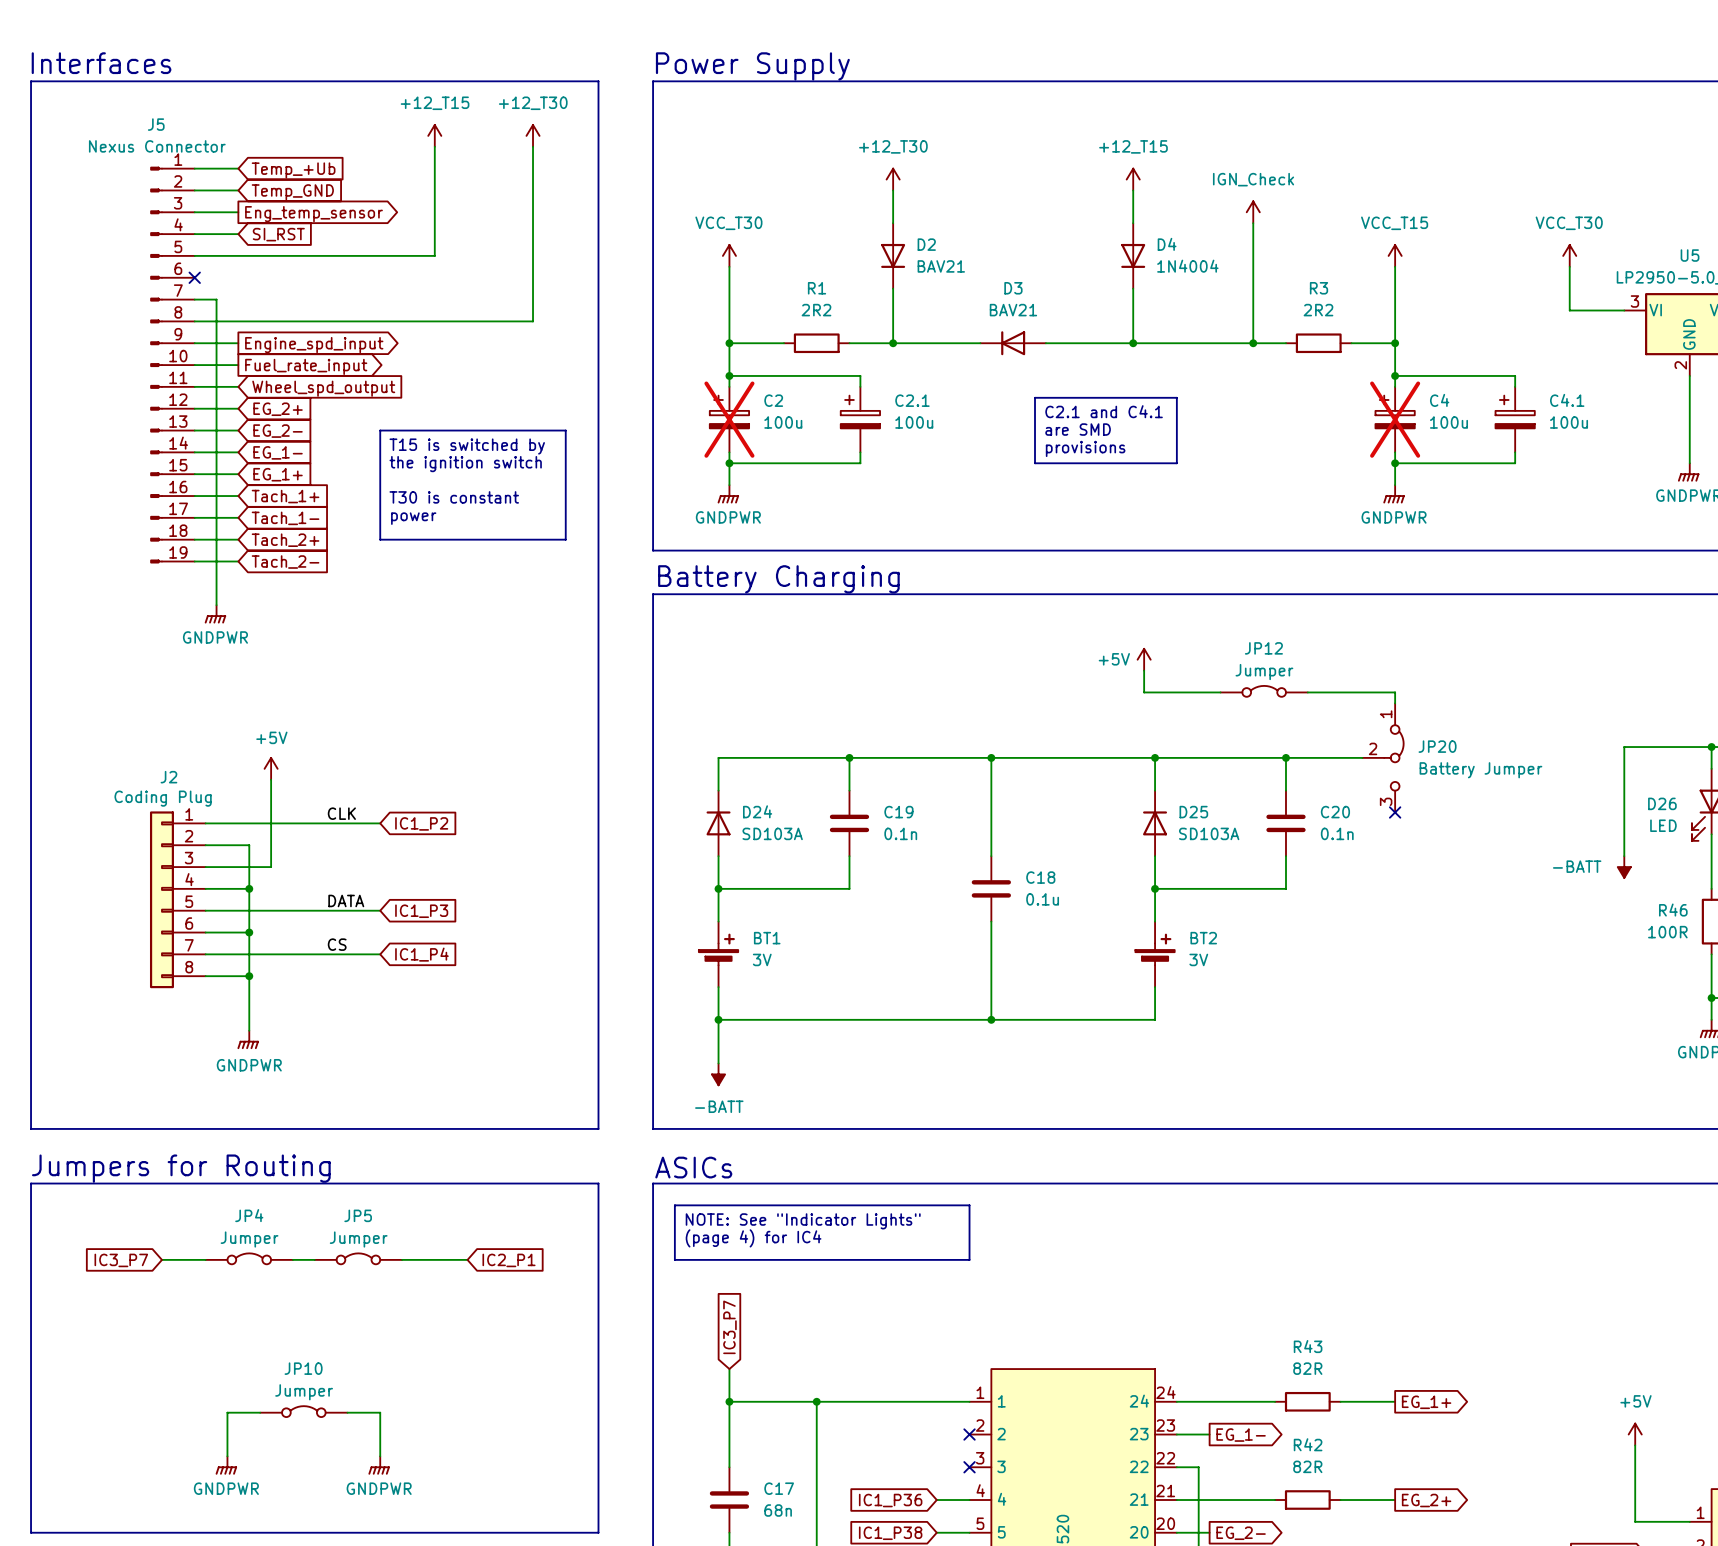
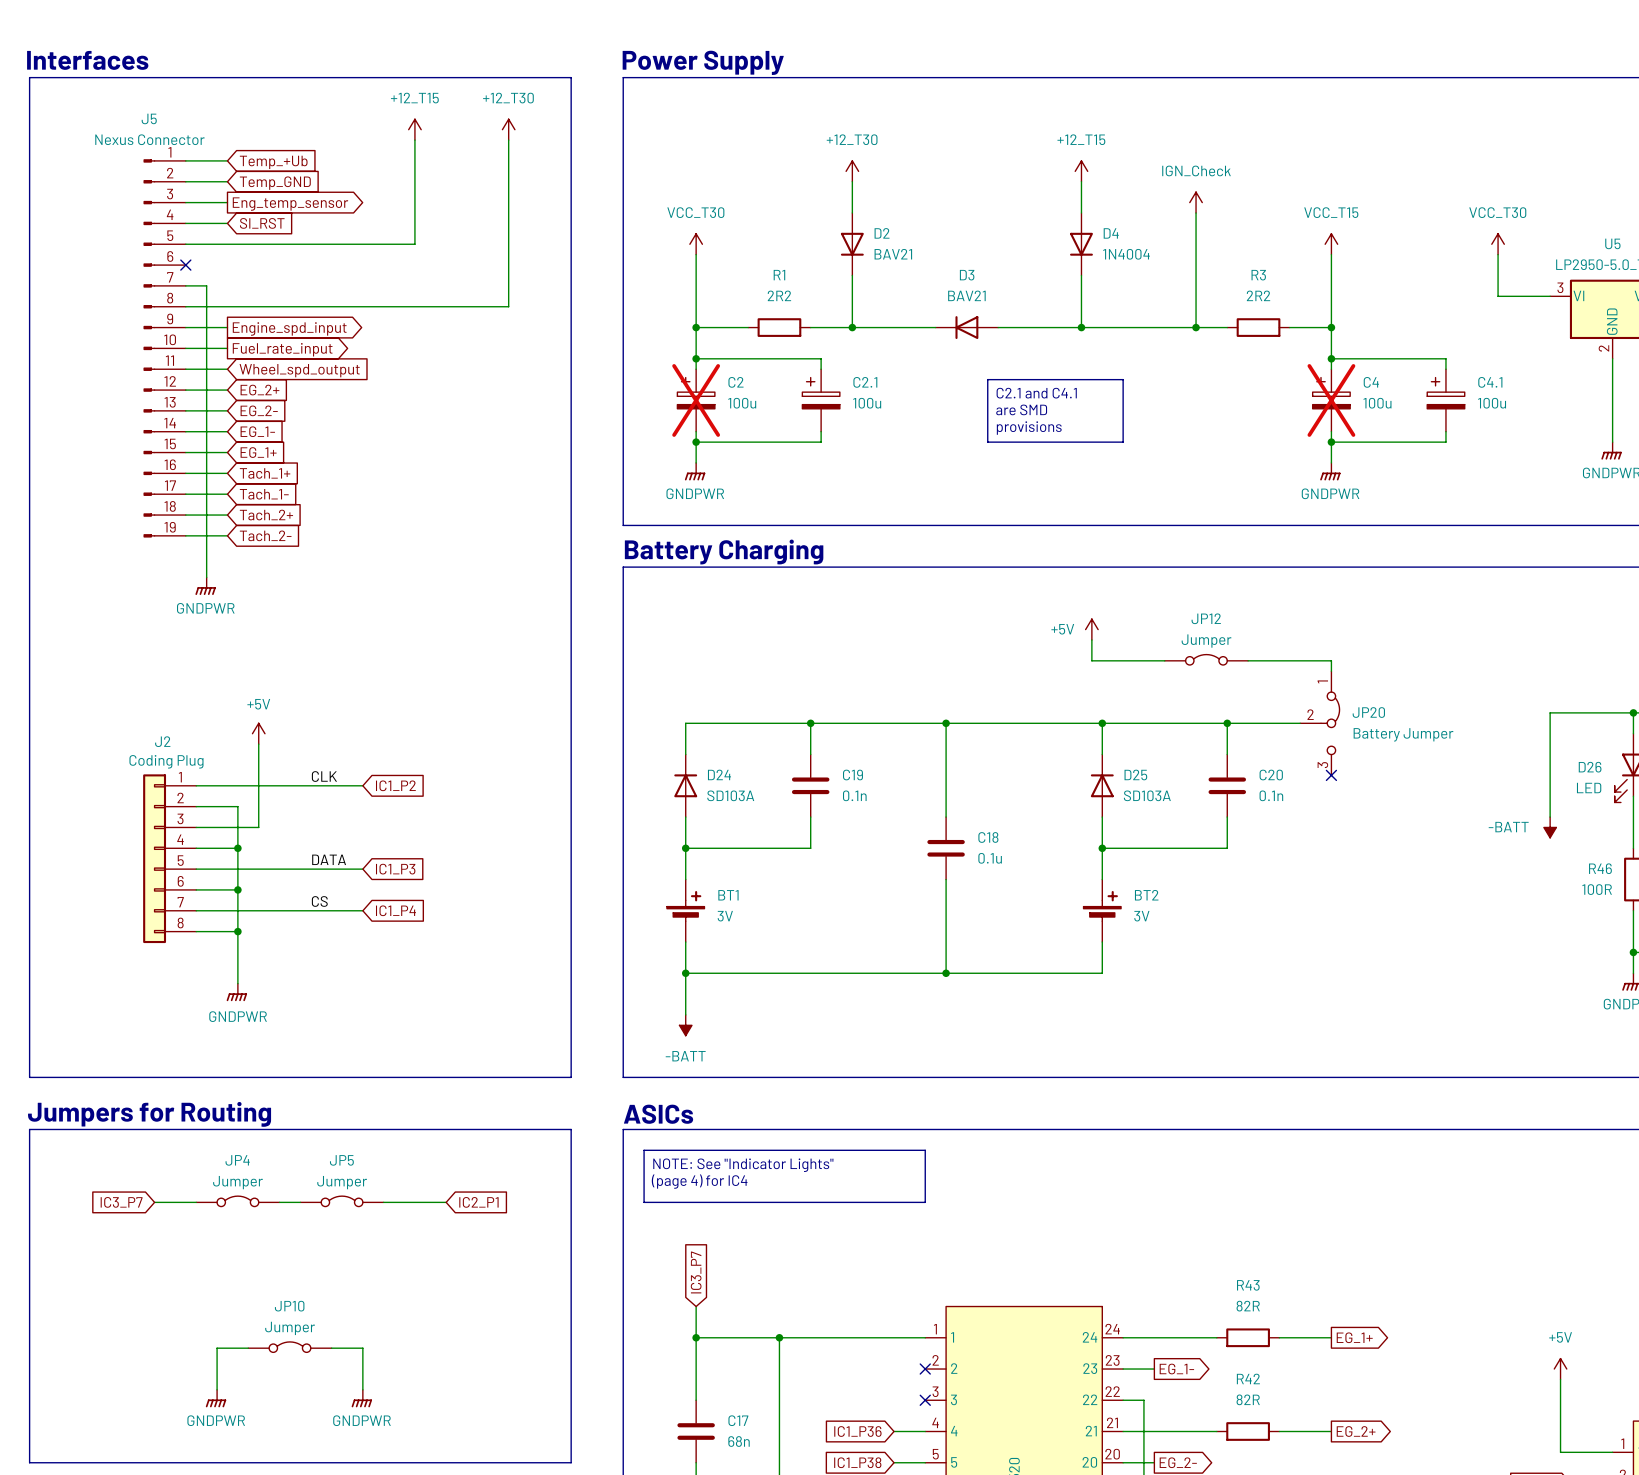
line: (380, 430) (565, 430) (565, 539) (380, 539) (380, 430) -> none
text: T15 is switched by (467, 446) -> none
text: the ignition switch (465, 464) -> none
text: T30 is constant (454, 497) -> none
text: power (413, 518) -> none

